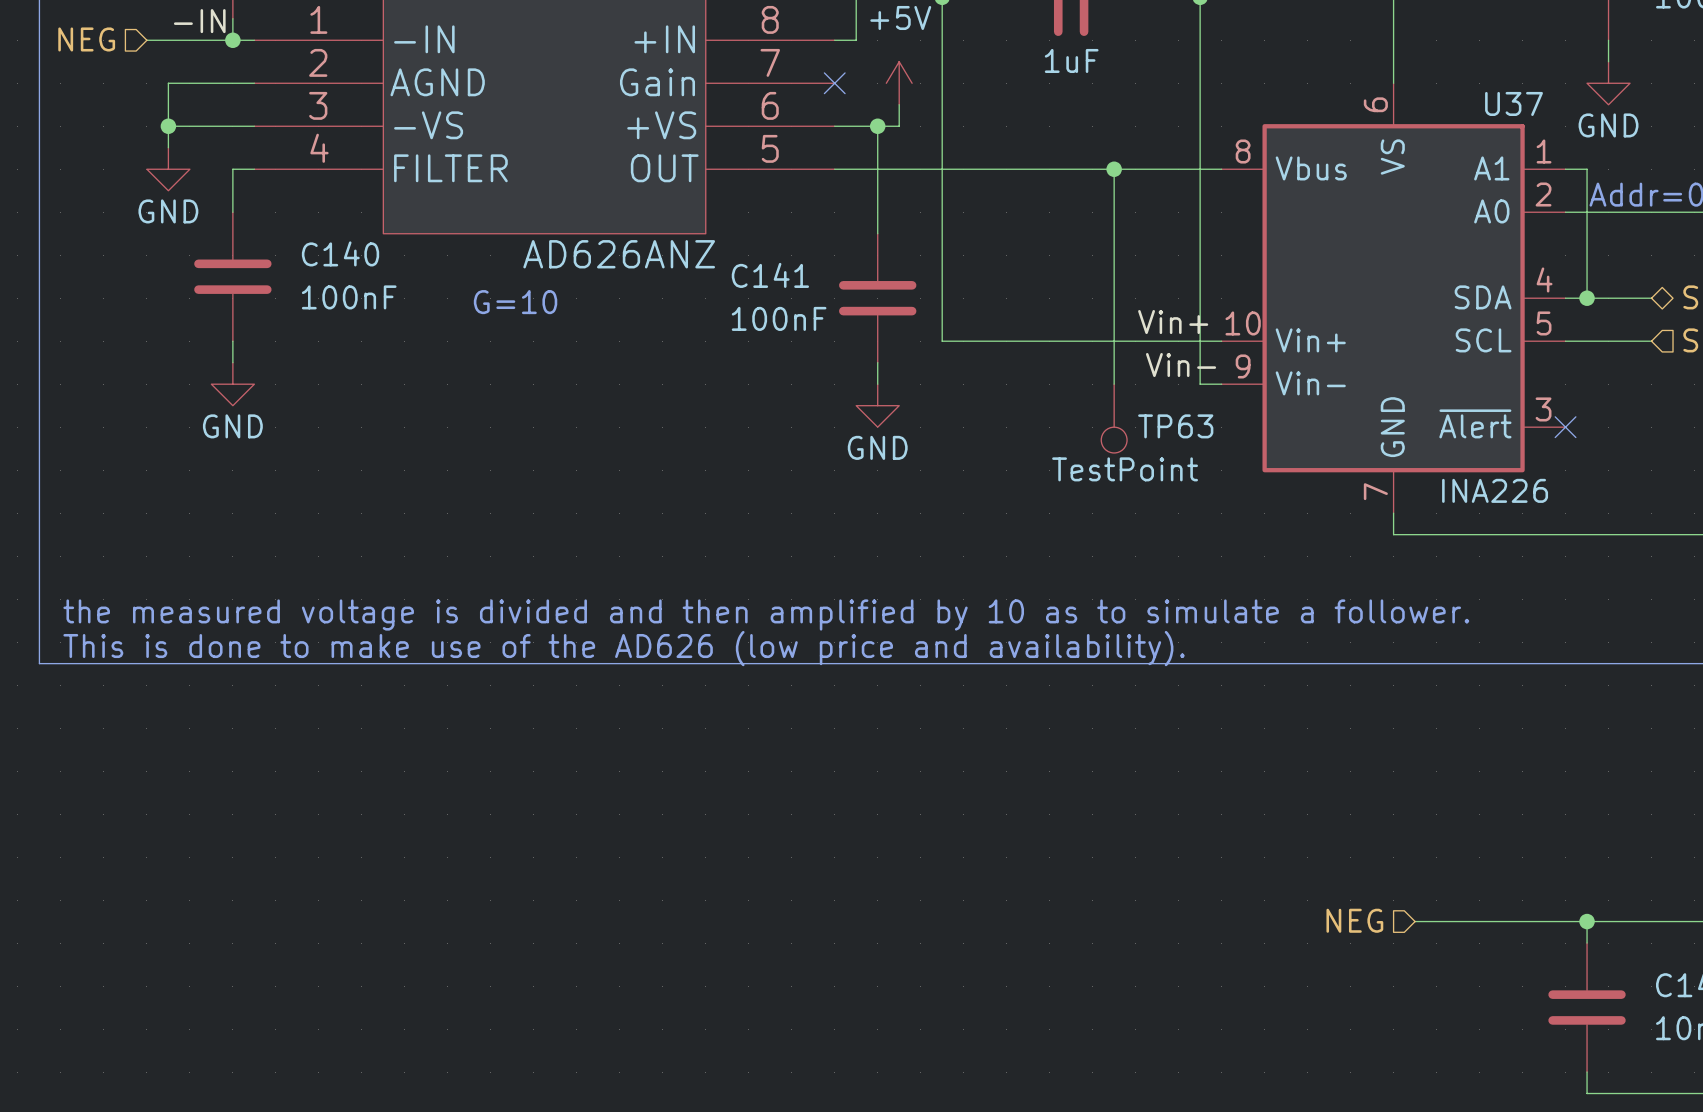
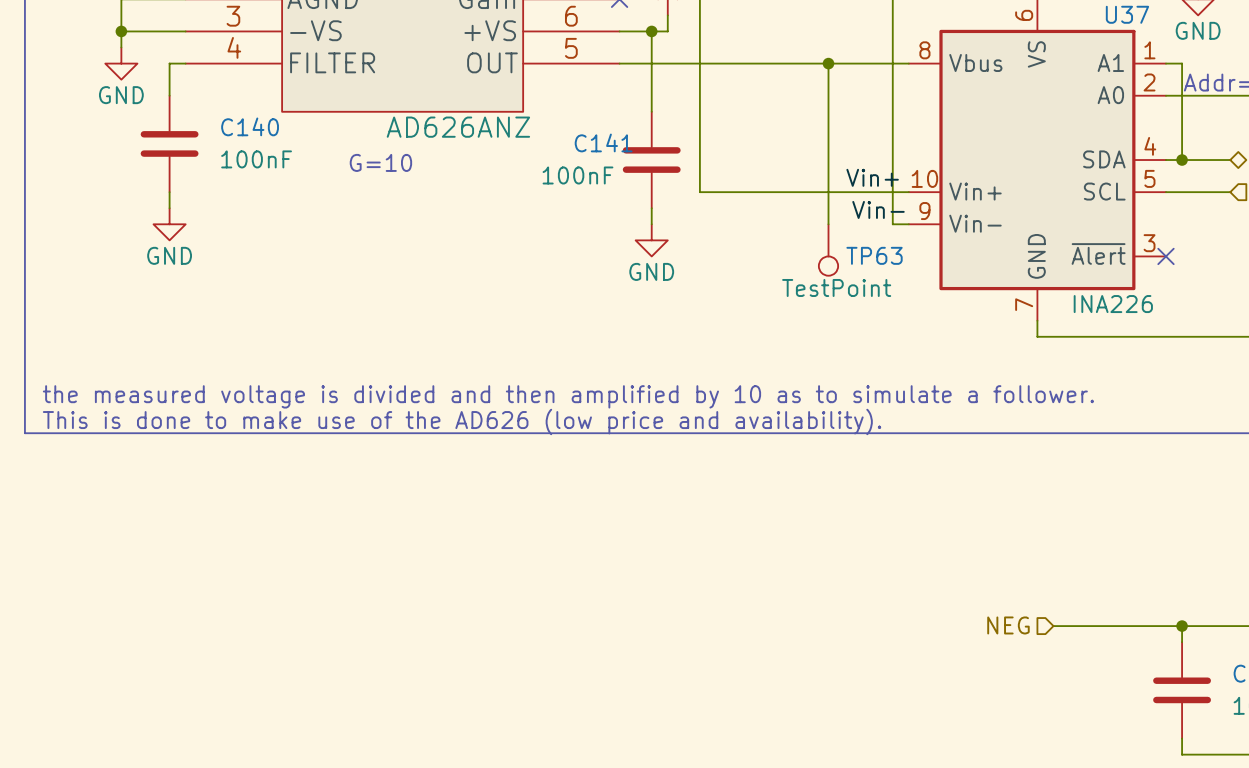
C141 name position: C141 (770, 275) -> C141 (603, 142)

